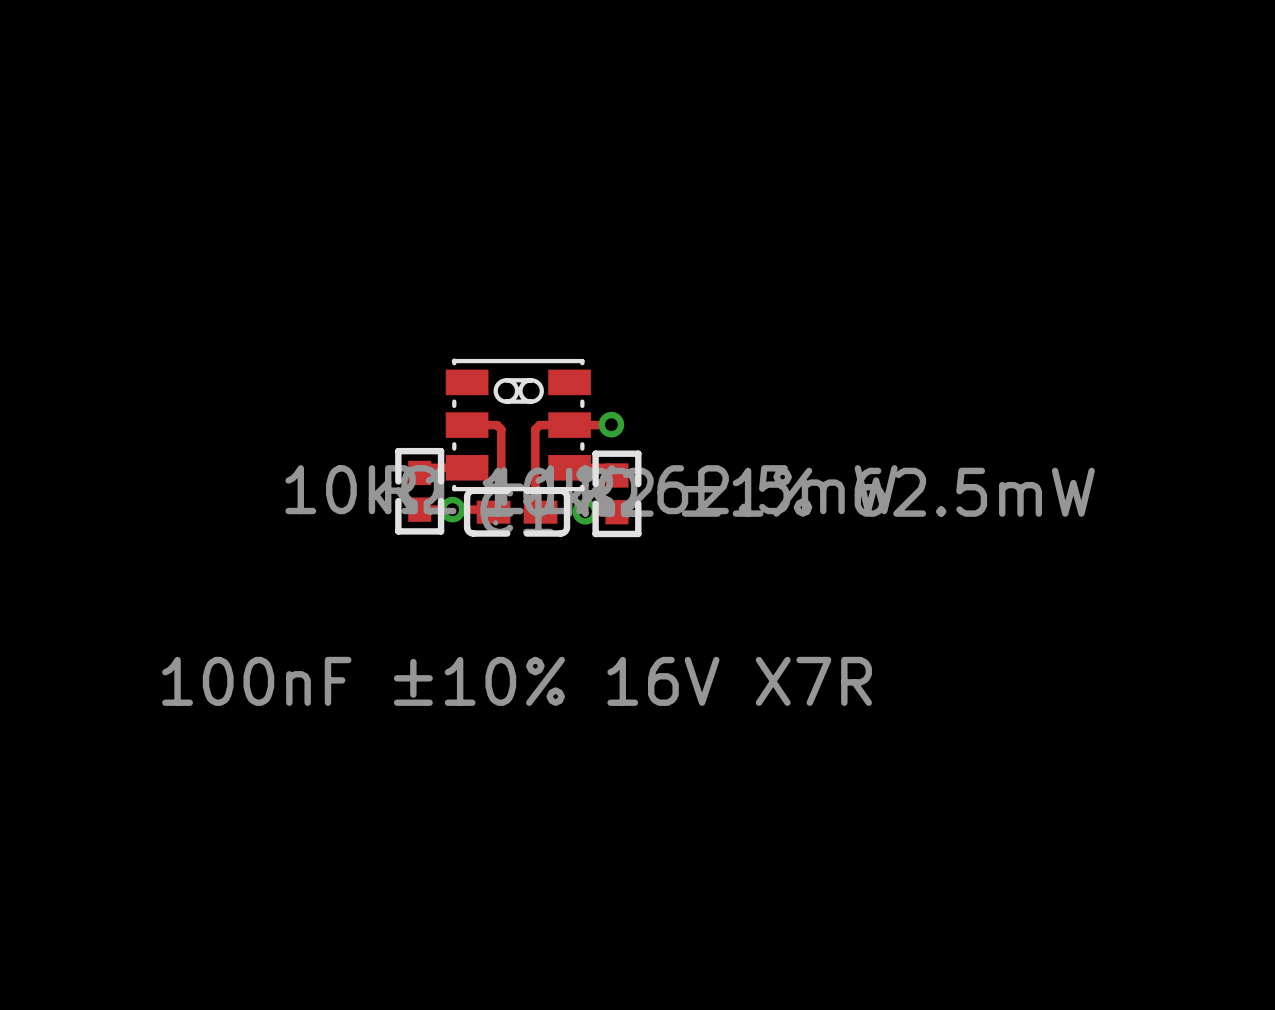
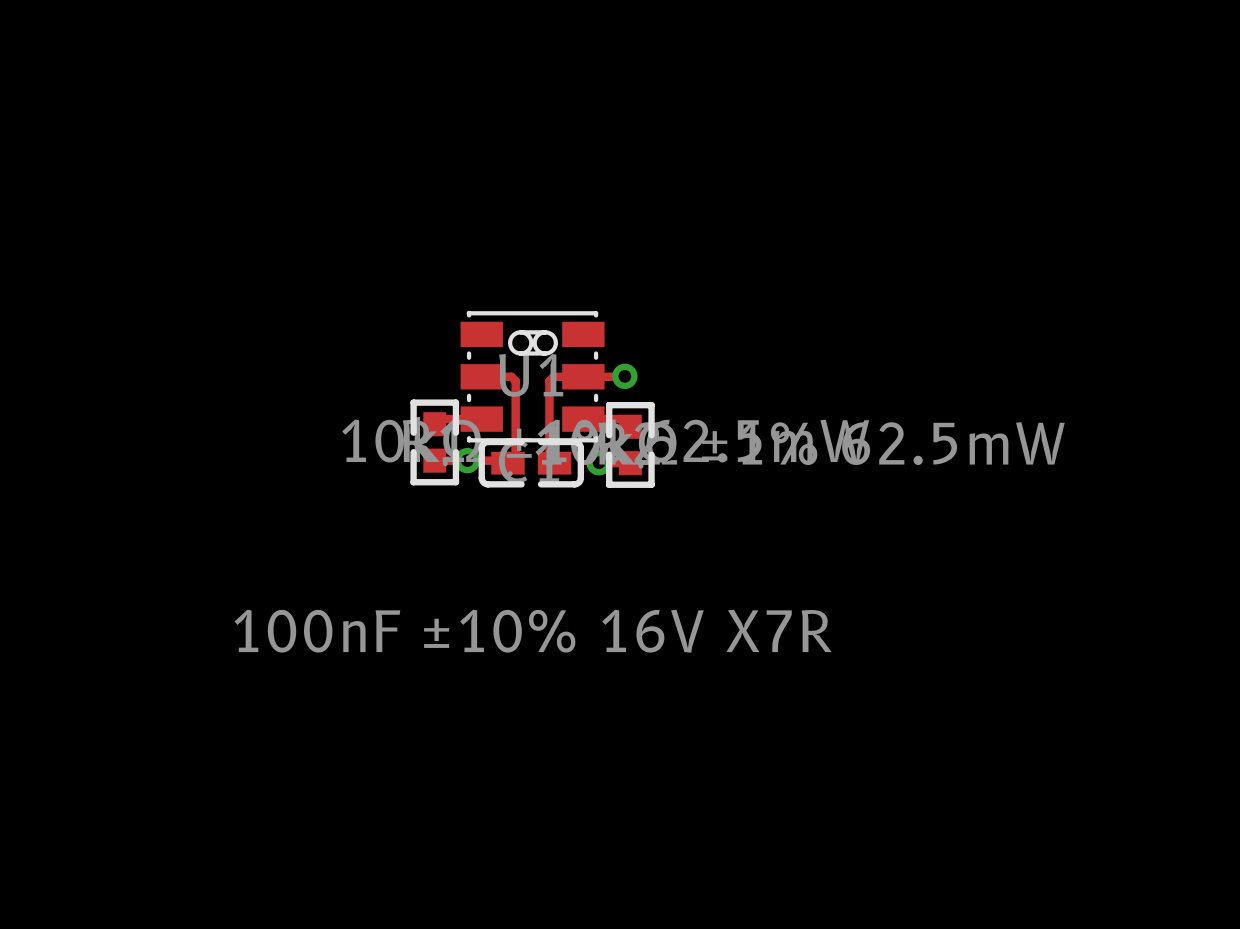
U1 name: none -> U1 (531, 375)

